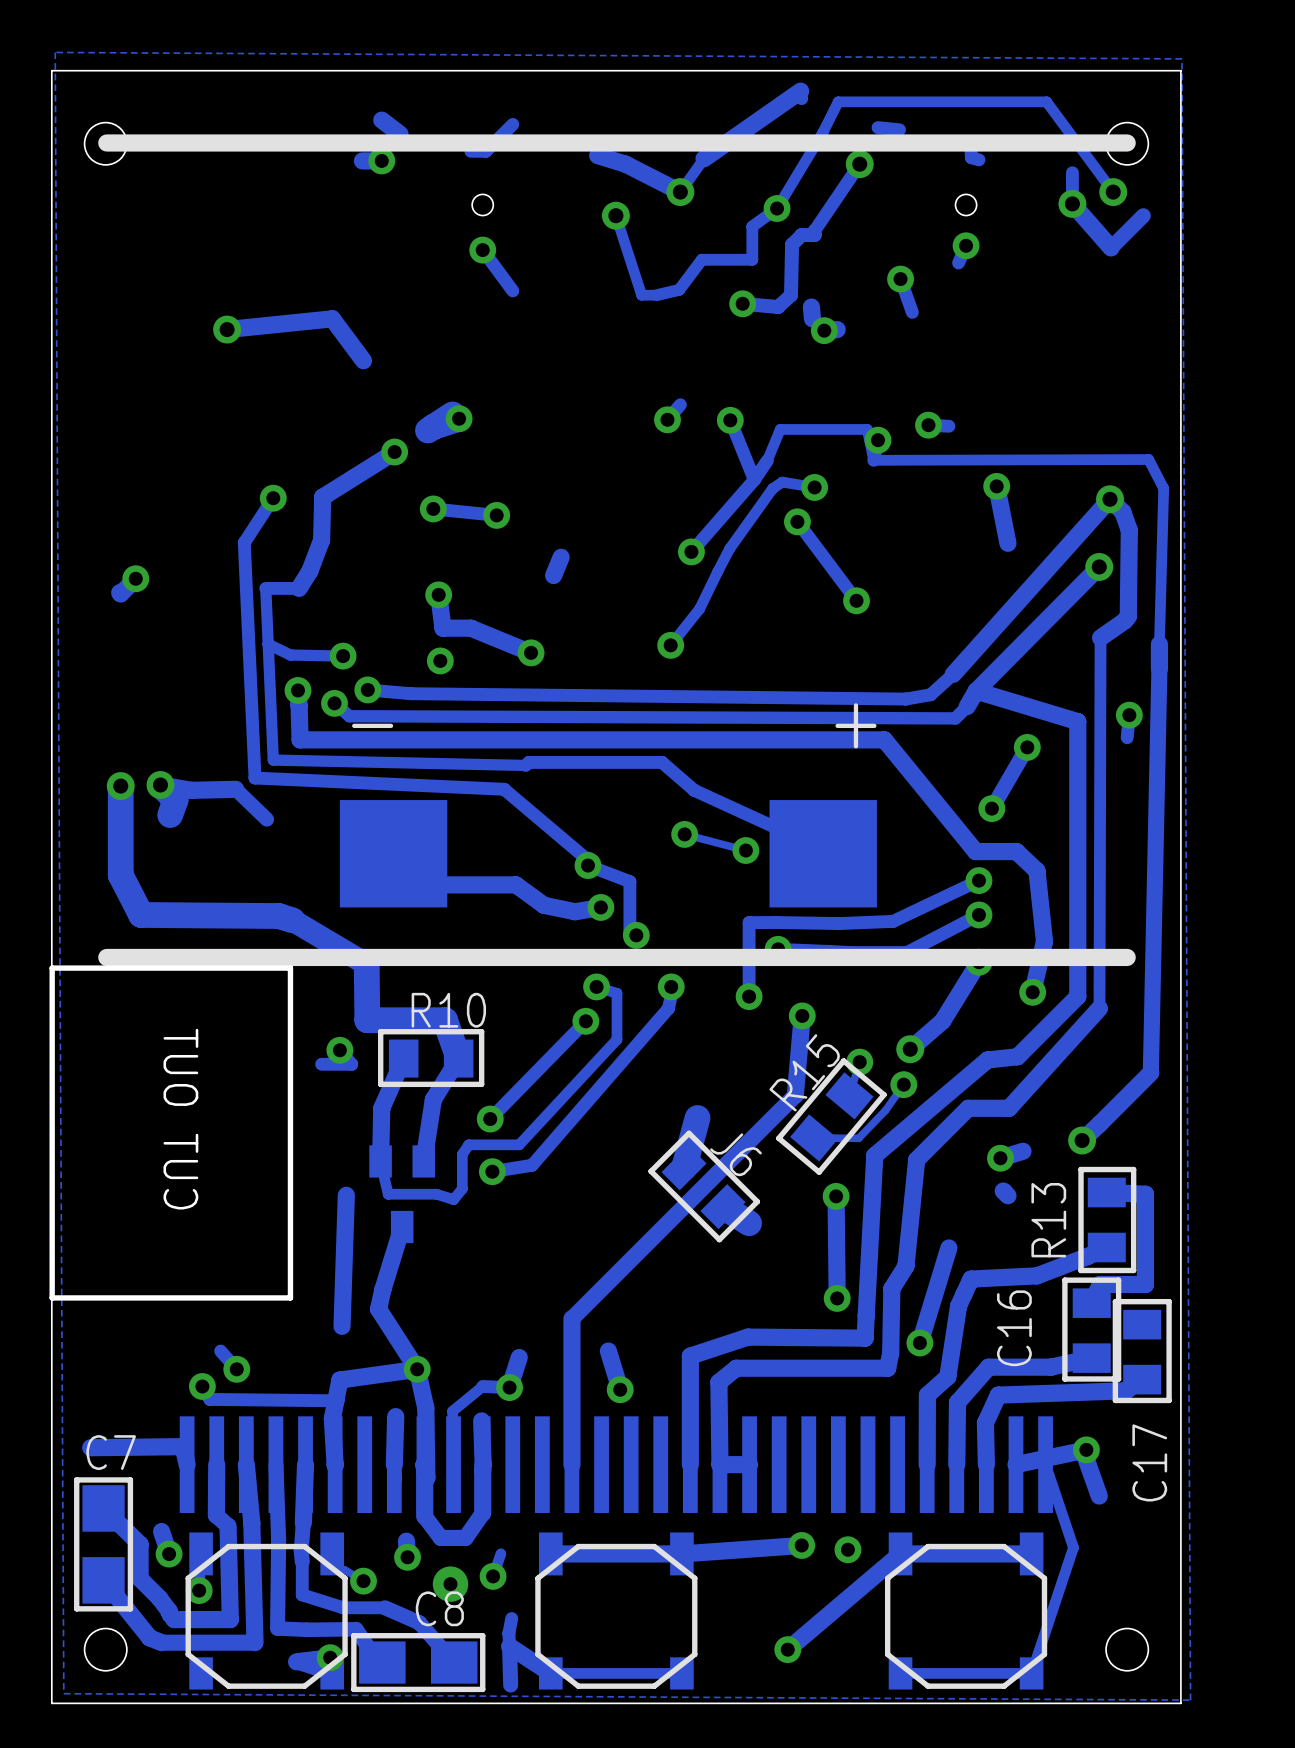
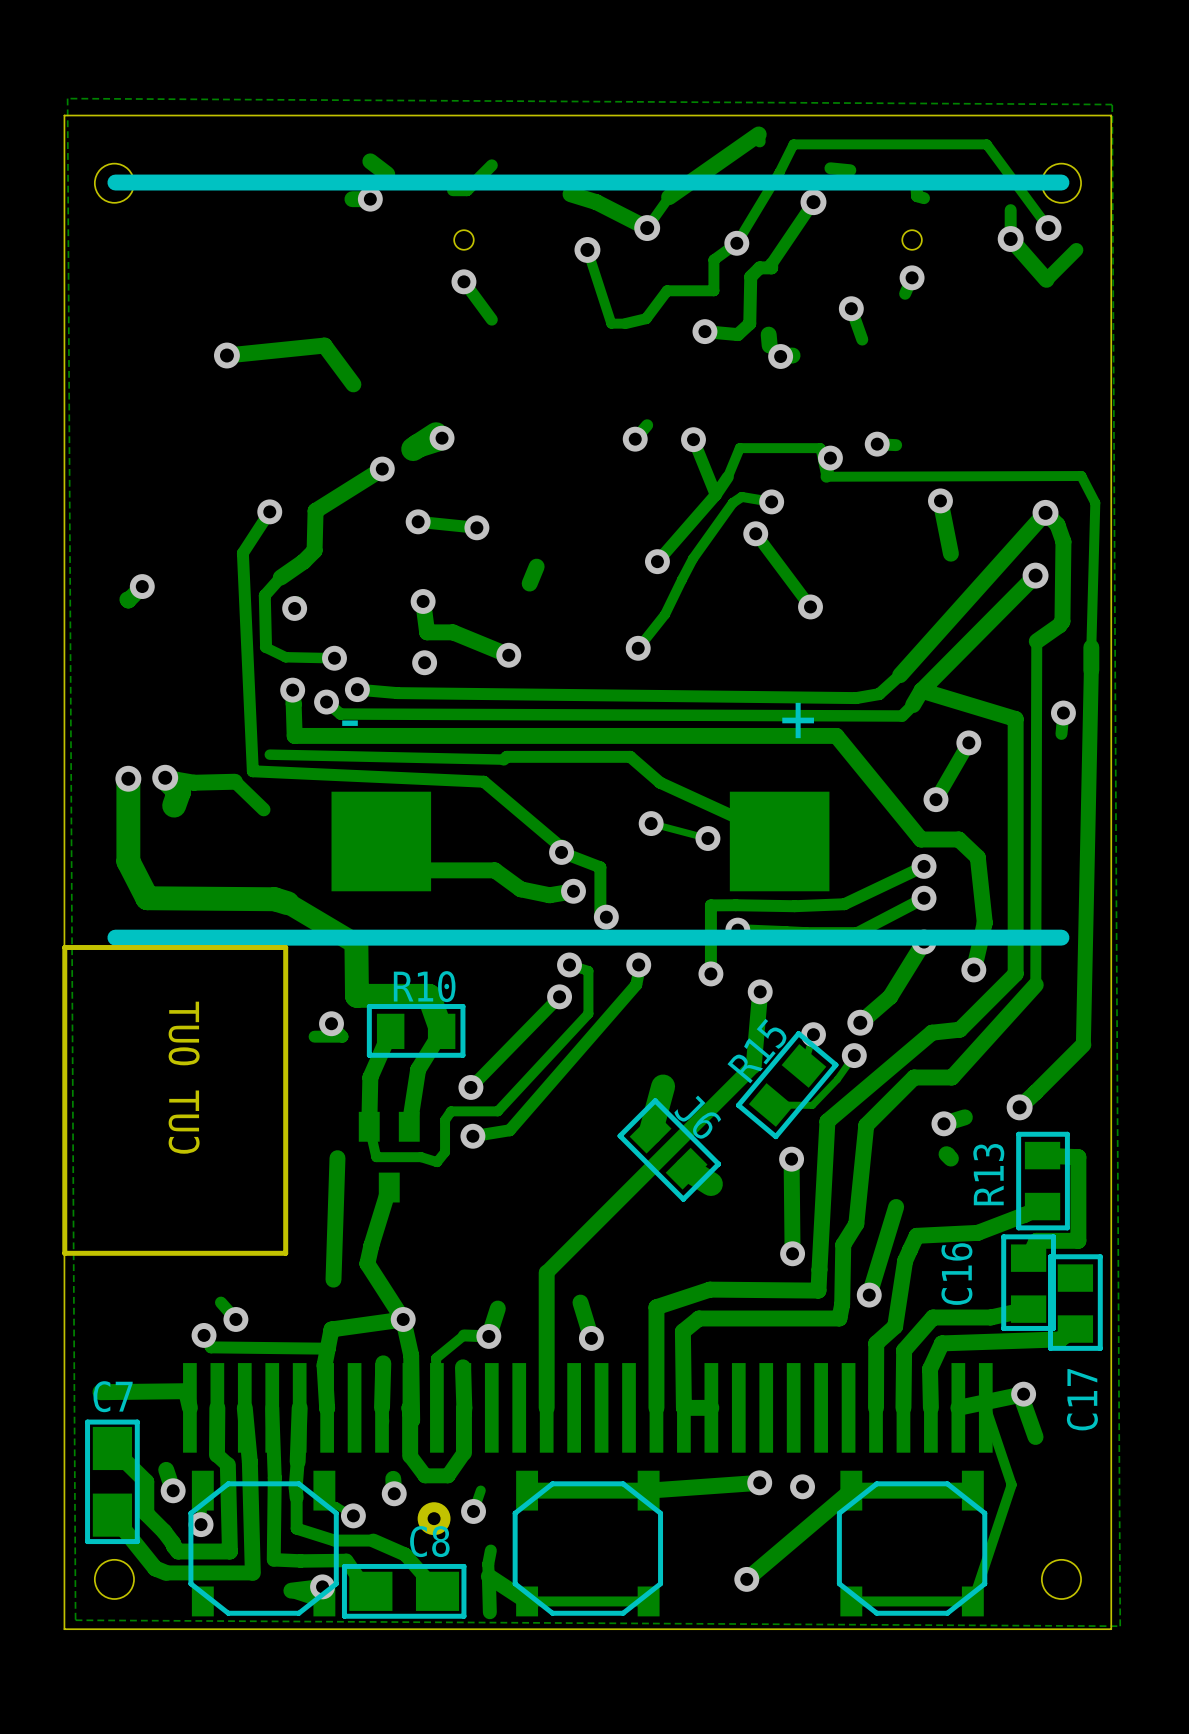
track: (321, 540) (309, 571) (299, 588) (265, 588) (273, 760) -> (314, 550) (303, 561) (280, 577) (264, 595) (266, 647)
via: none -> (294, 608)

